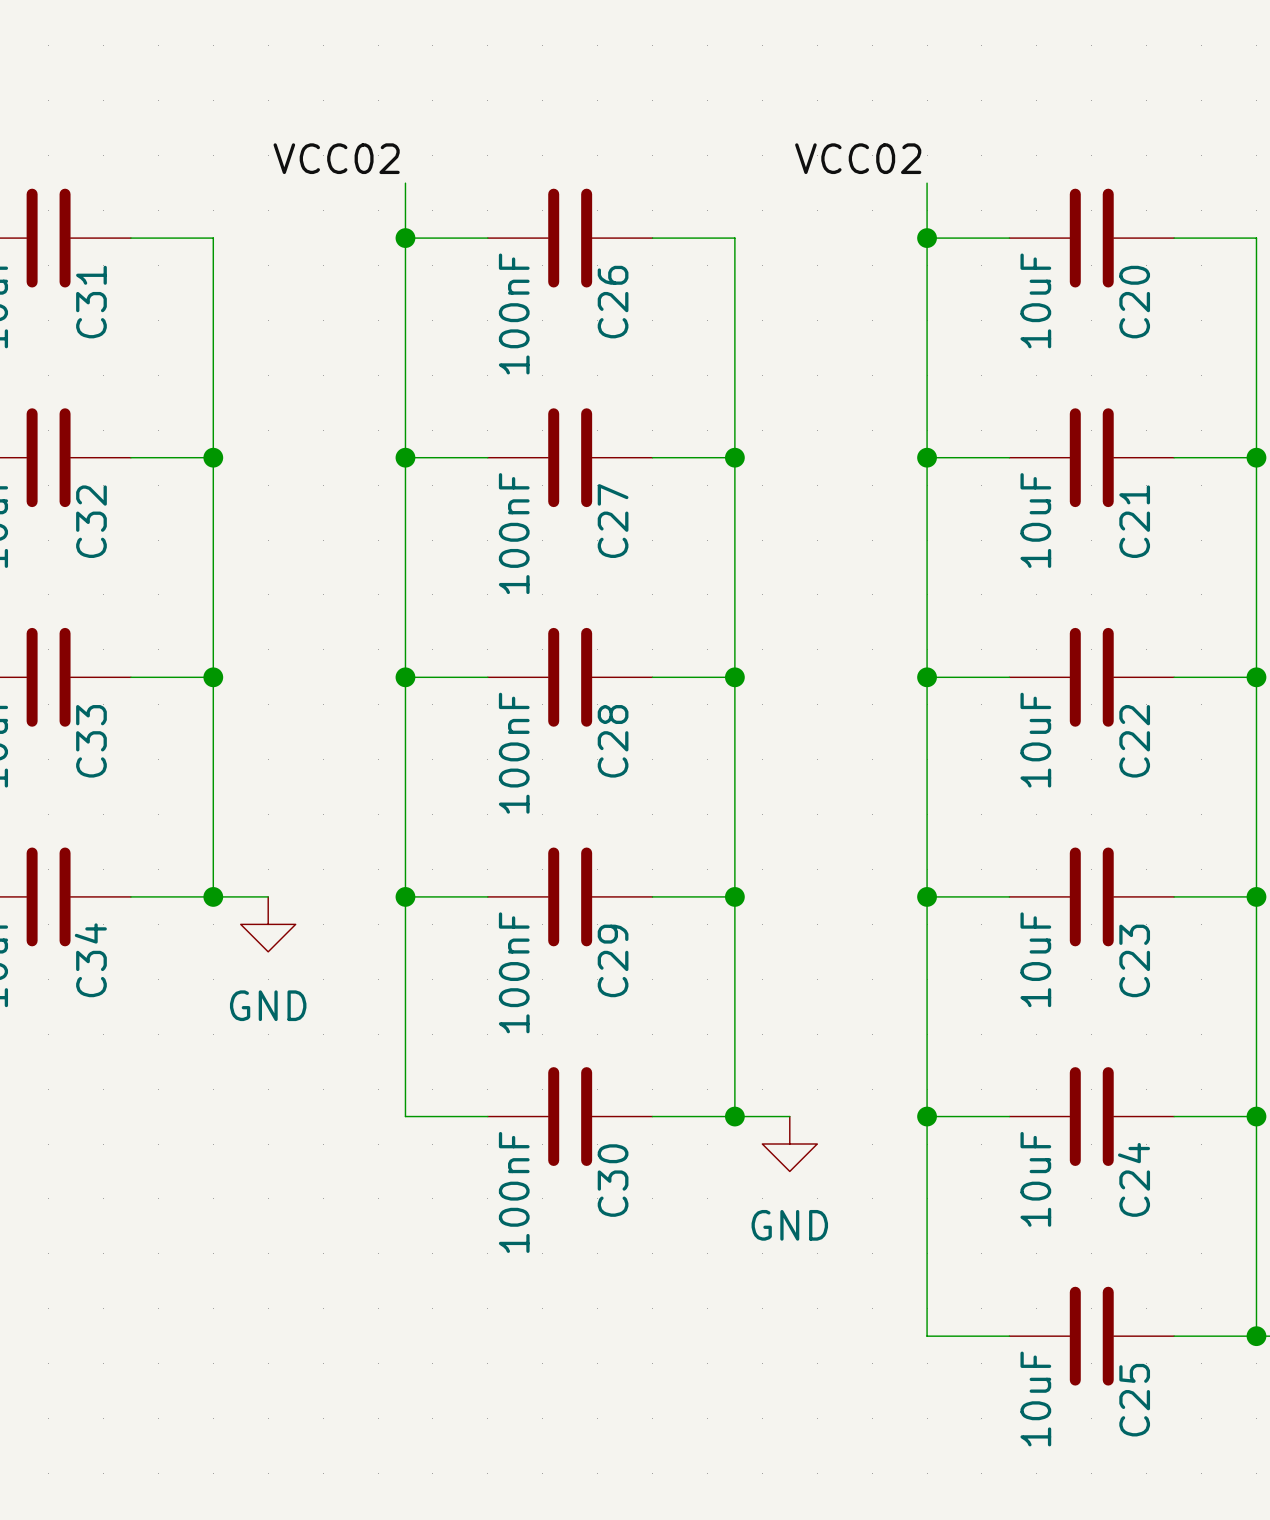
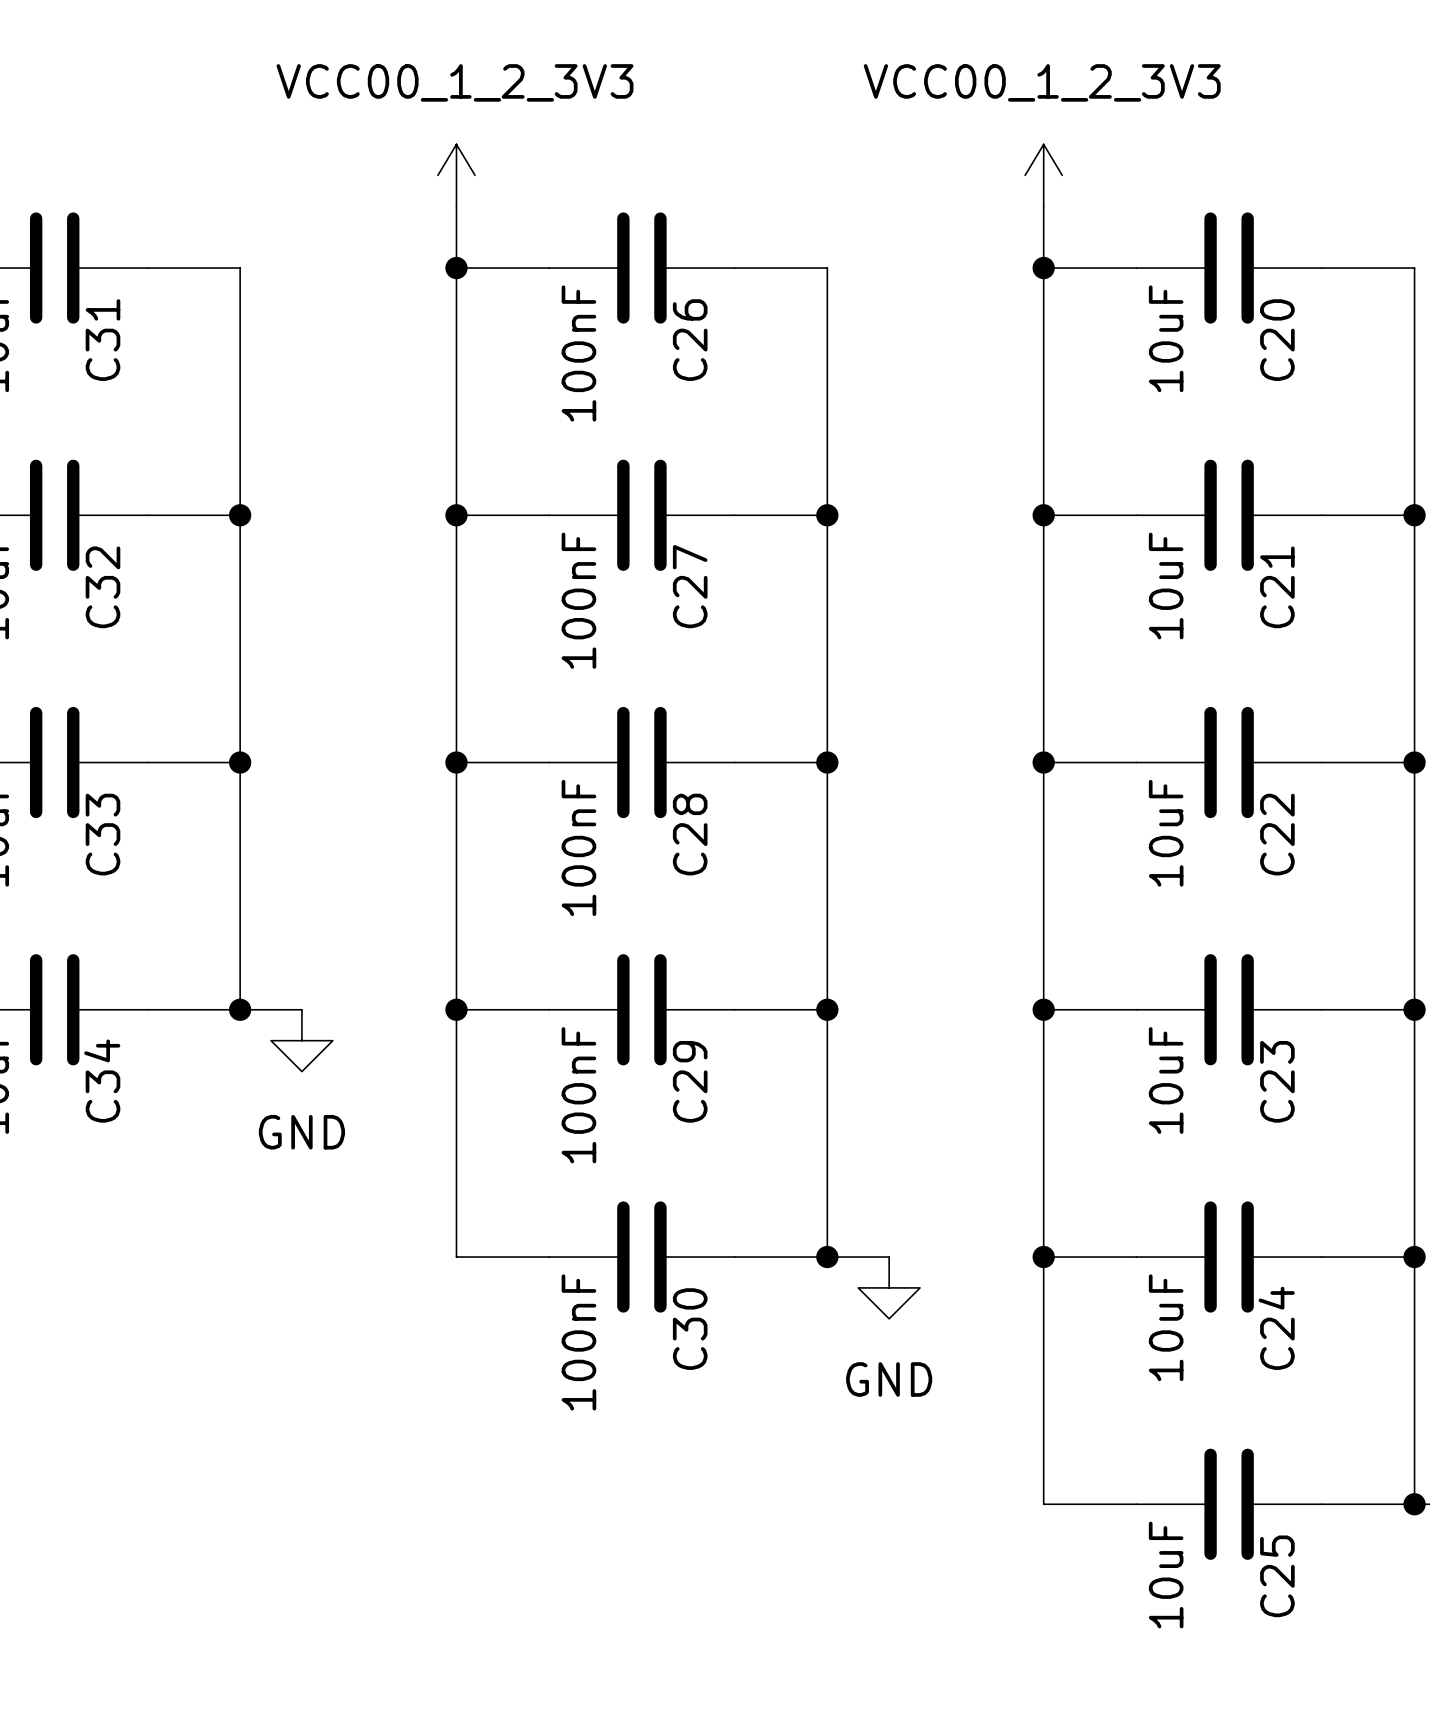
power symbol: none -> VCC00_1_2_3V3 (456, 175)
power symbol: none -> VCC00_1_2_3V3 (1043, 175)
label: VCC02 (336, 158) -> none
label: VCC02 (858, 158) -> none

